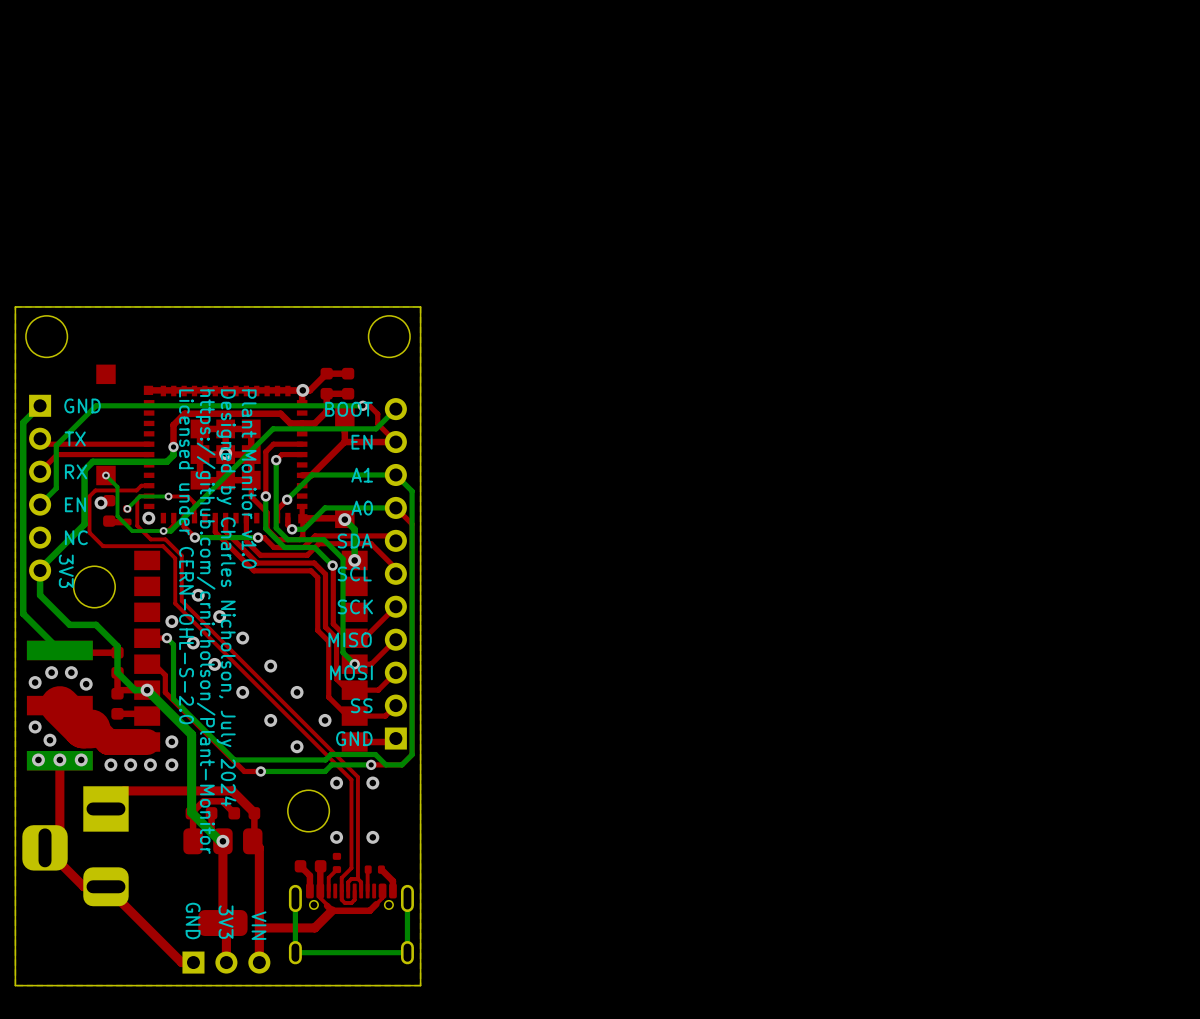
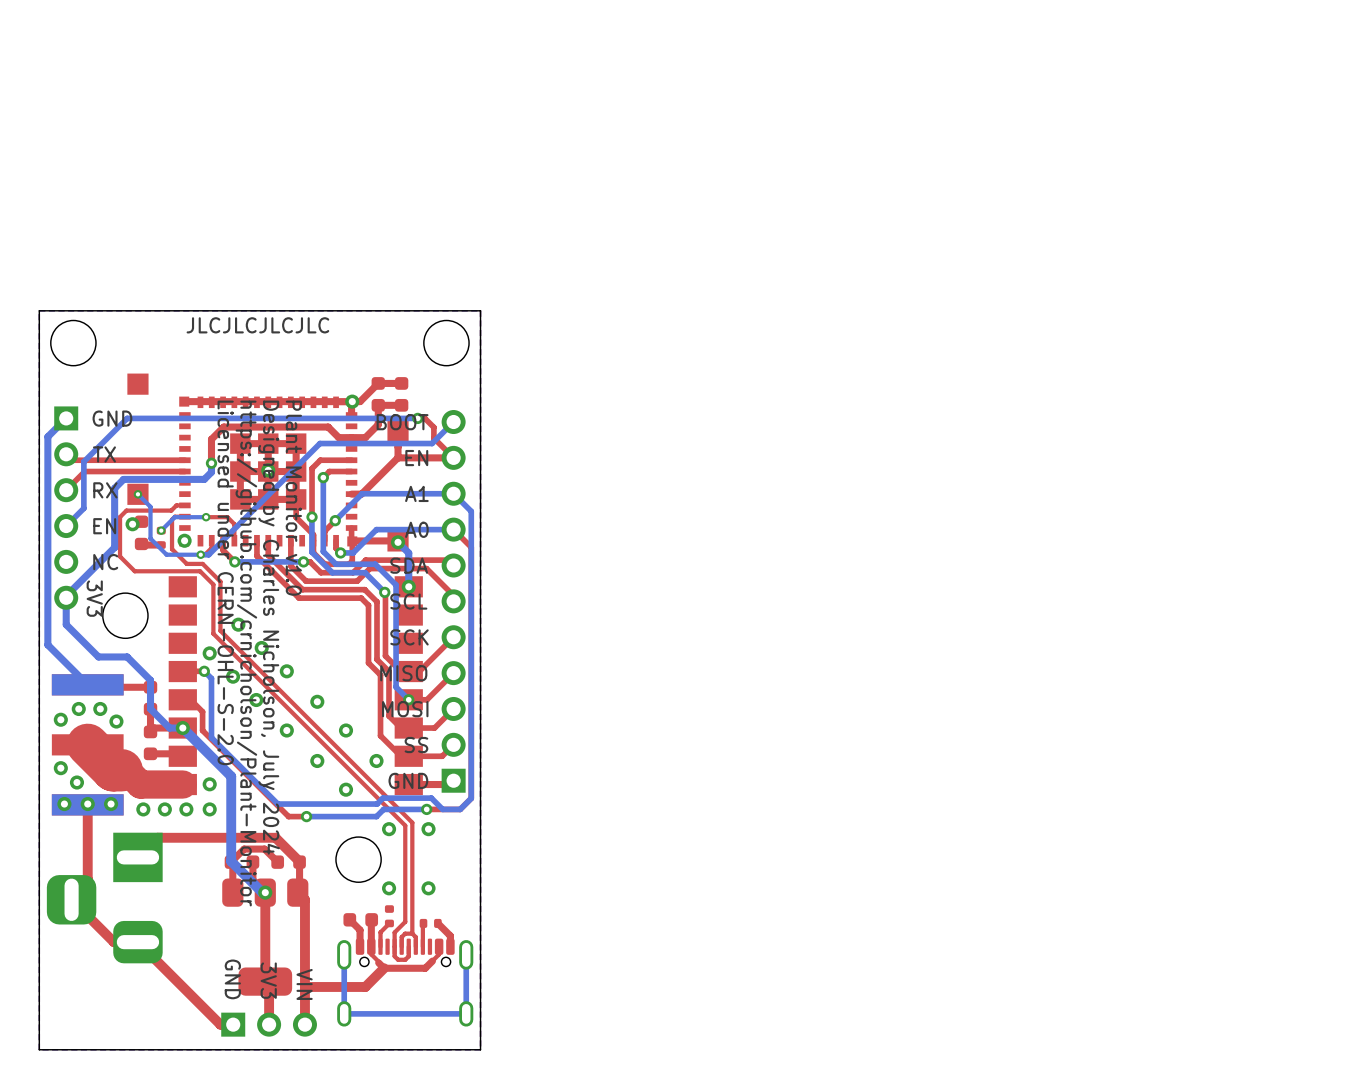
text: none -> JLCJLCJLCJLC (257, 325)

